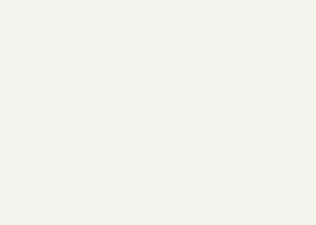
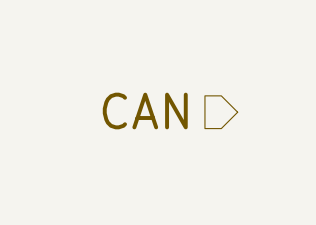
hierarchical label: none -> CAN (145, 111)

